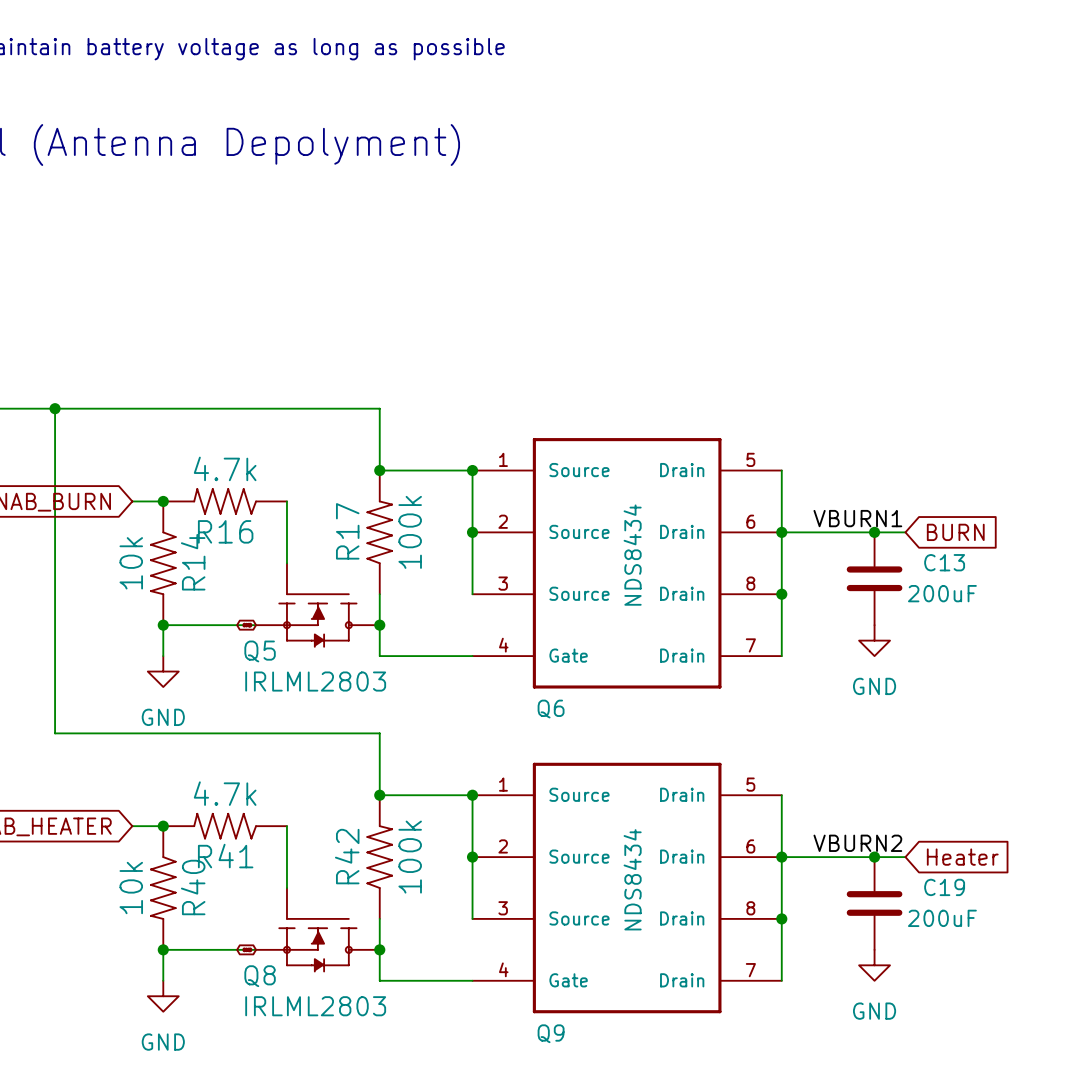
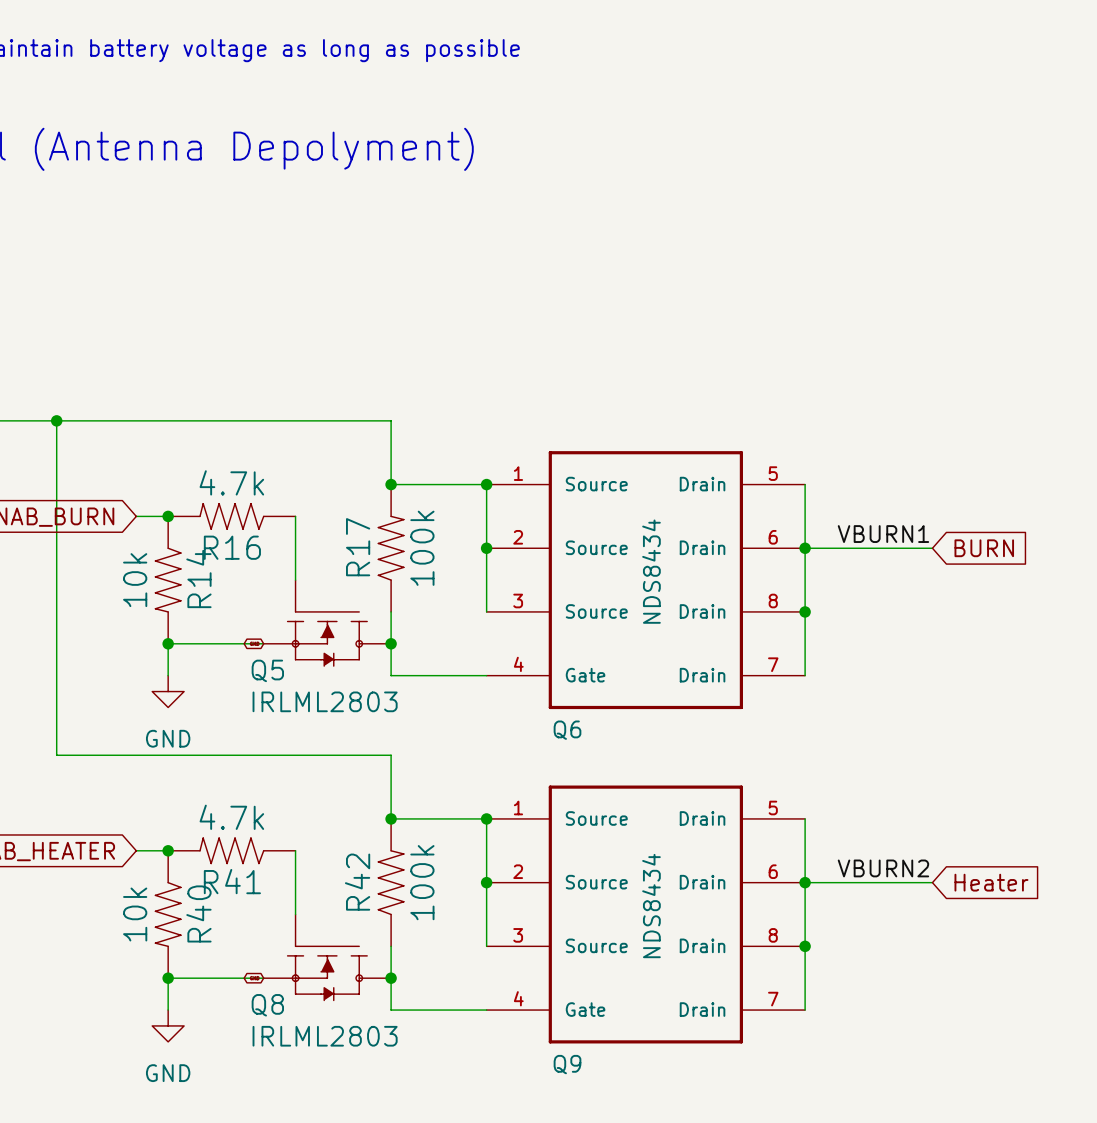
junction: (874, 532) -> none
C13: 200uF (874, 578) -> none
power symbol: GND (874, 640) -> none
junction: (874, 857) -> none
C19: 200uF (874, 903) -> none
power symbol: GND (874, 965) -> none

